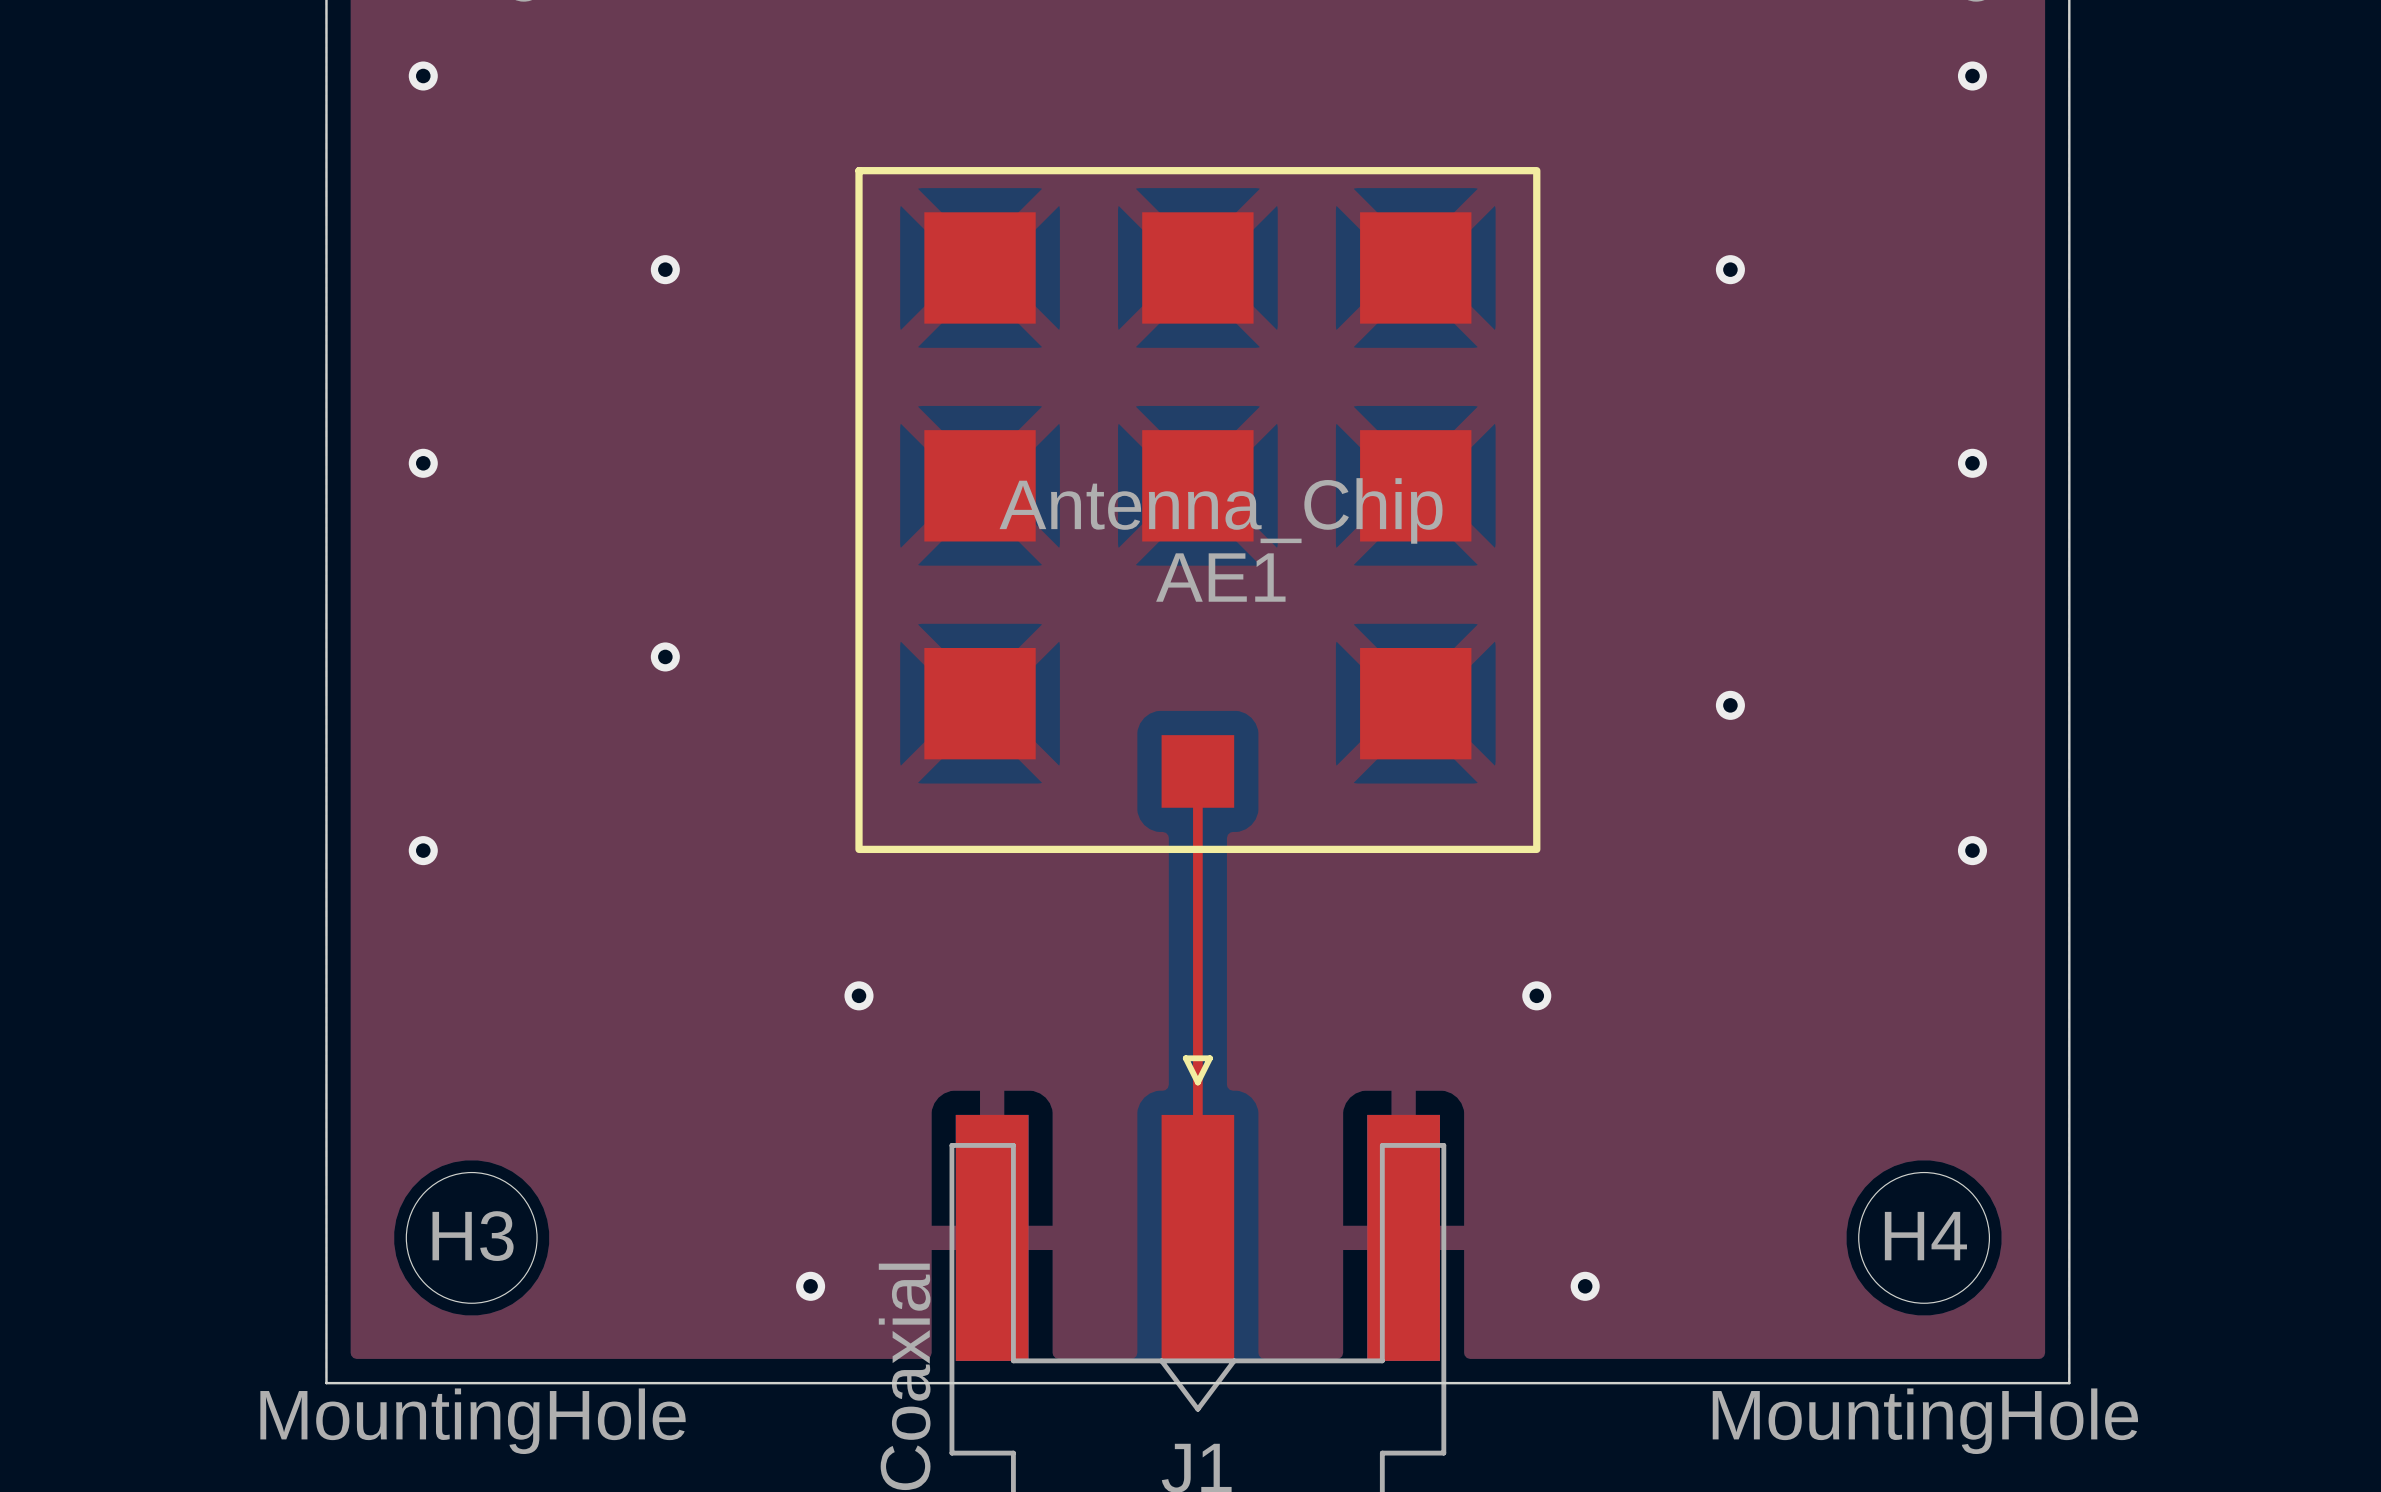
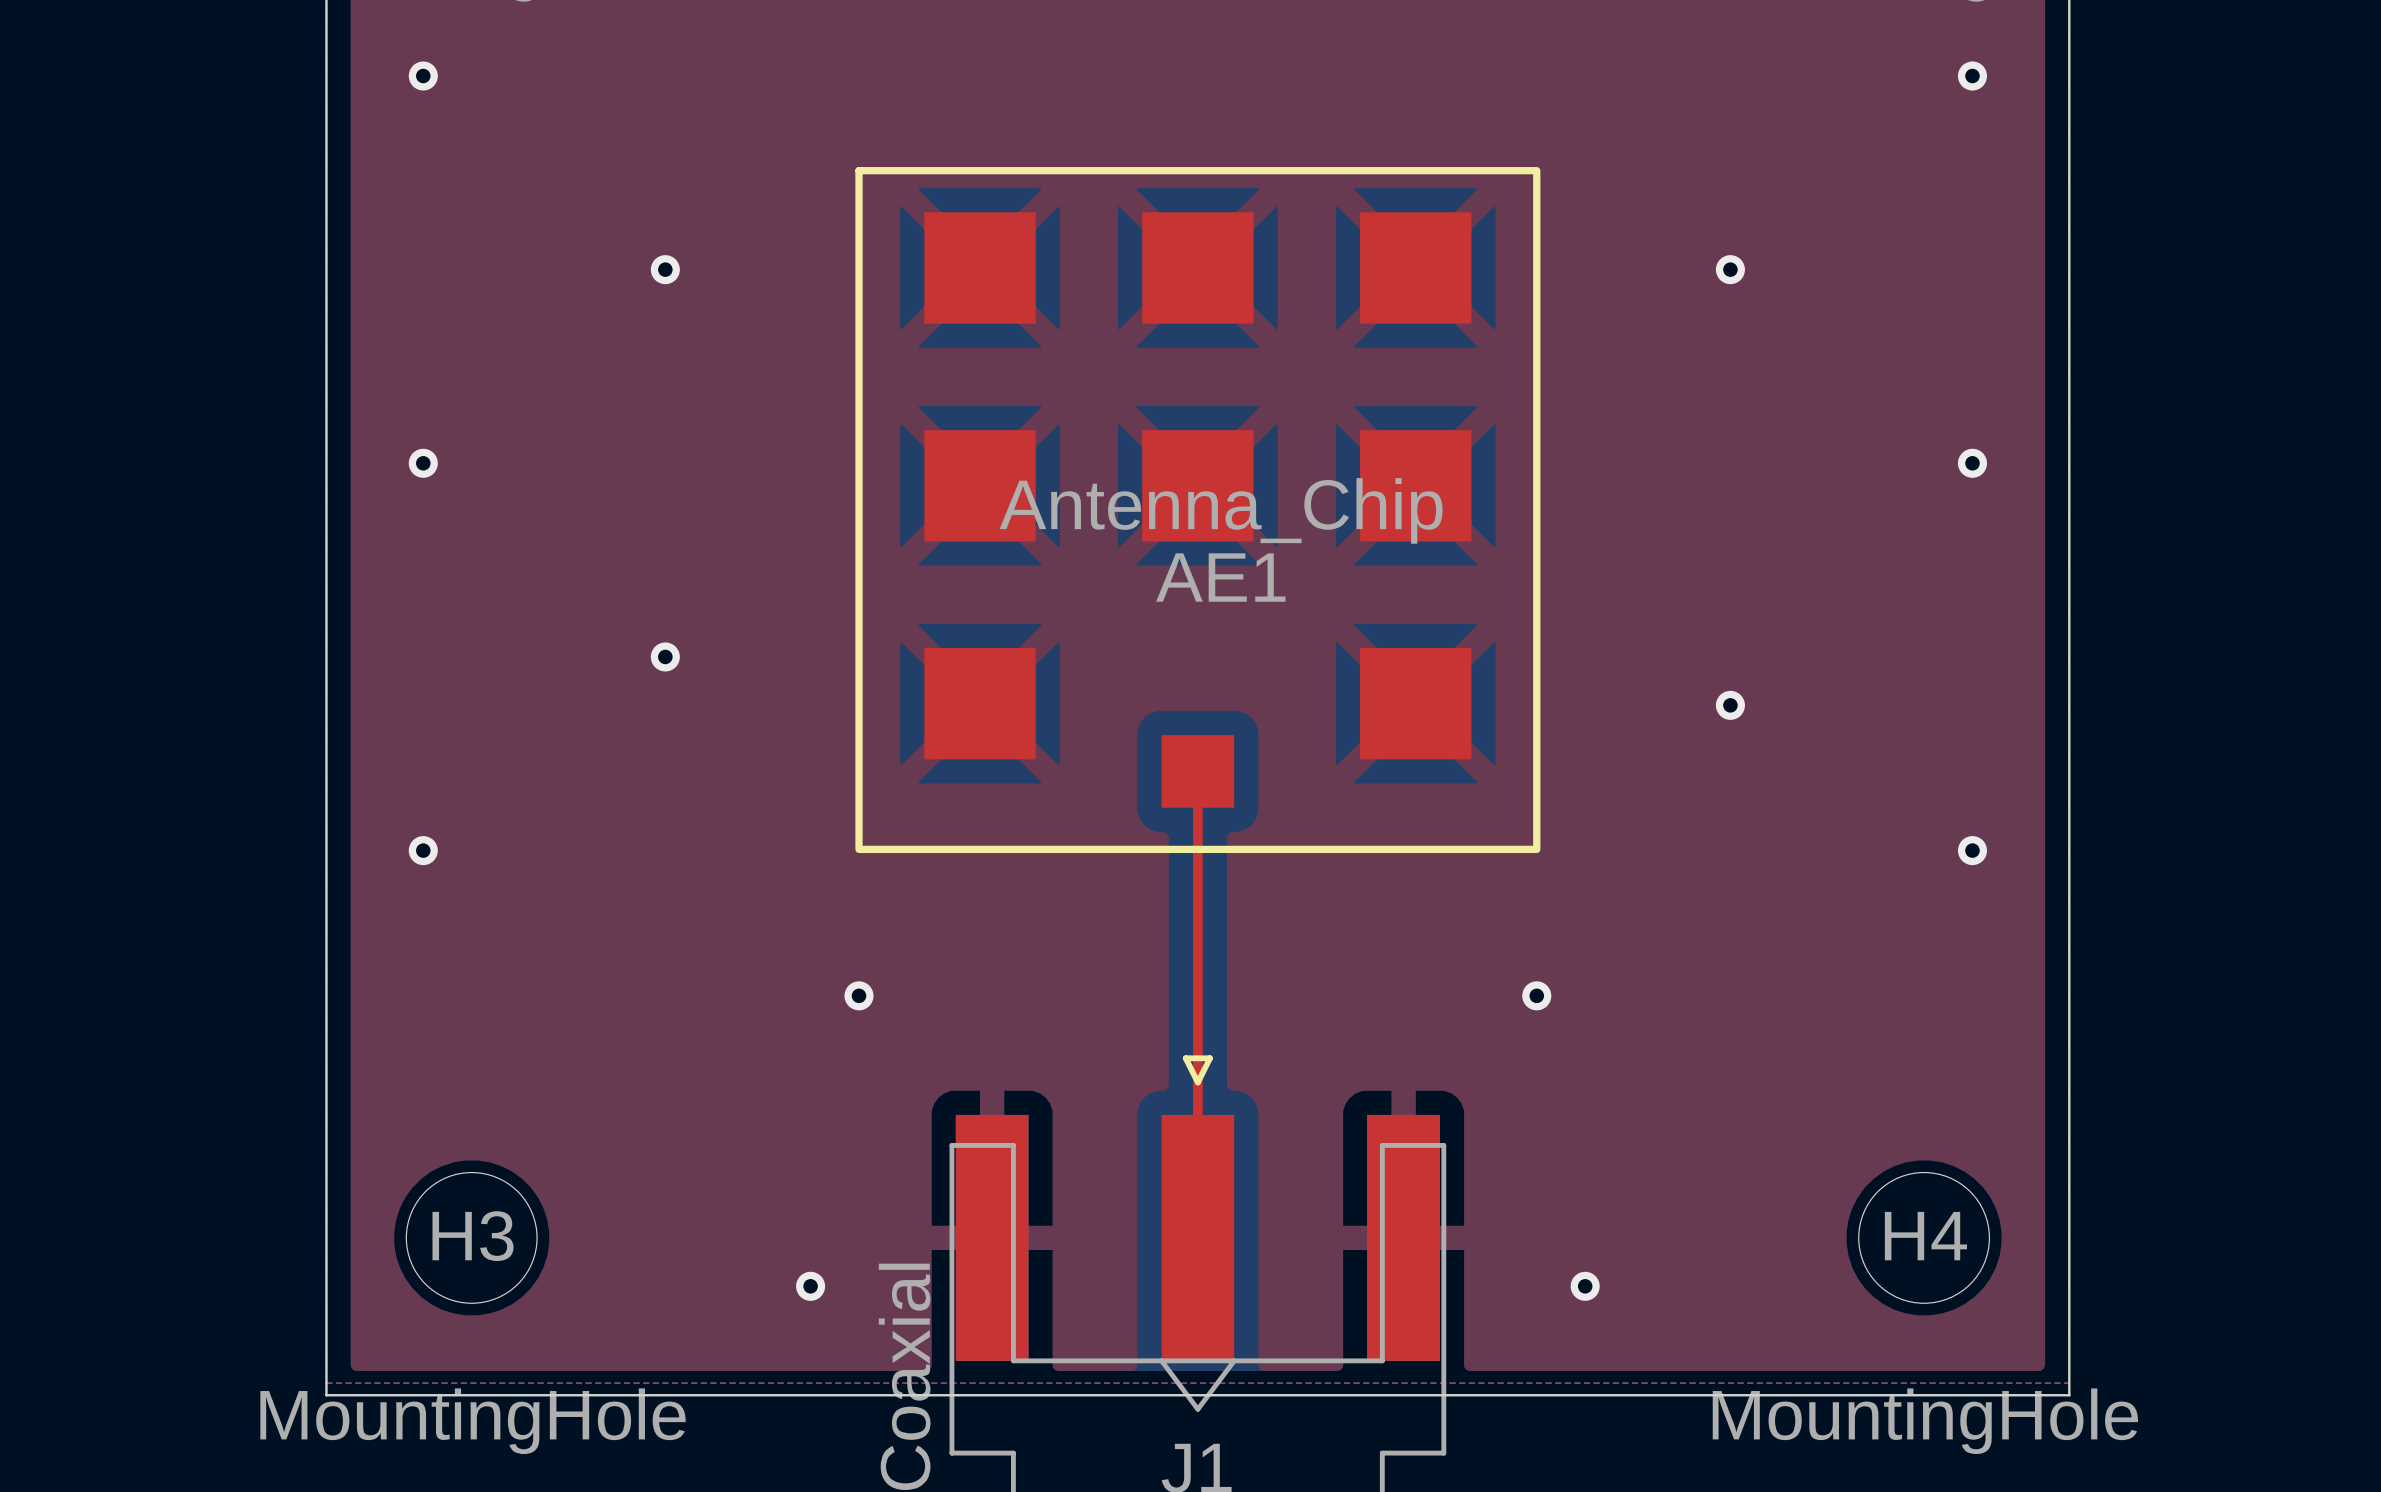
board edge: (326, 1383) (2069, 1383) -> (326, 1383) (326, 1395) (2069, 1395) (2069, 1383)

